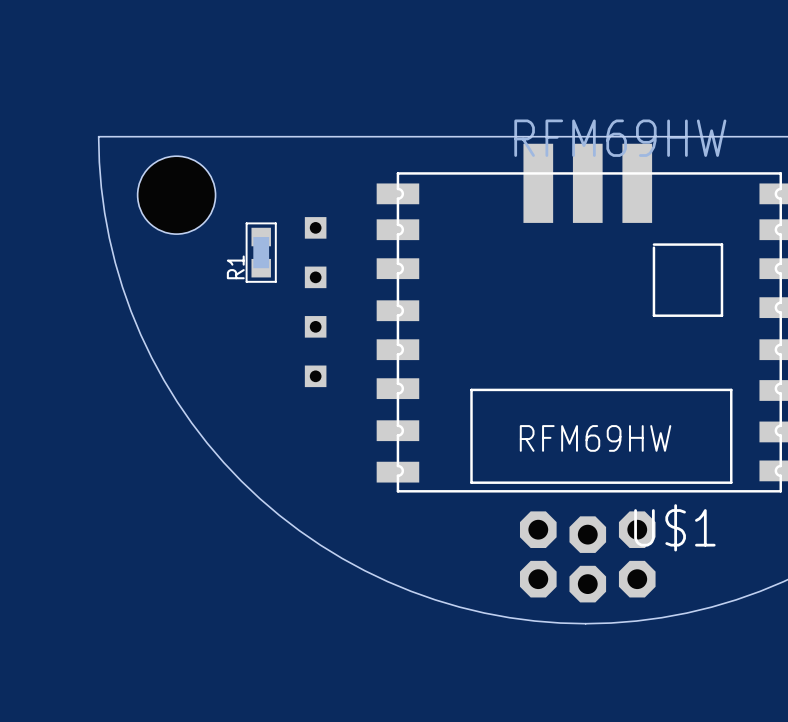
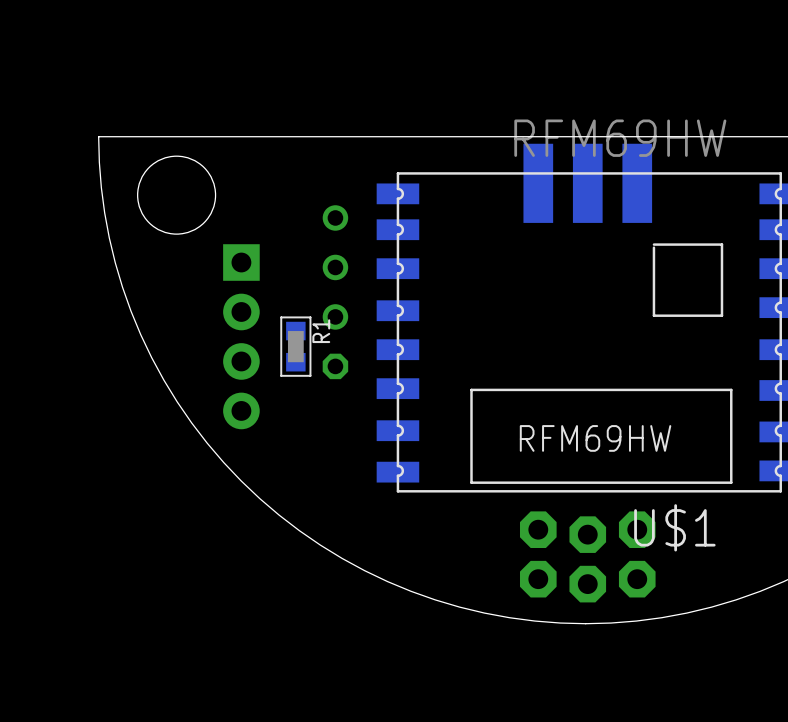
R1 position: (261, 252) -> (295, 346)
R1 name position: R1 (235, 267) -> R1 (321, 331)
part: none -> (335, 292)
part: (315, 302) -> none
part: none -> (241, 336)

